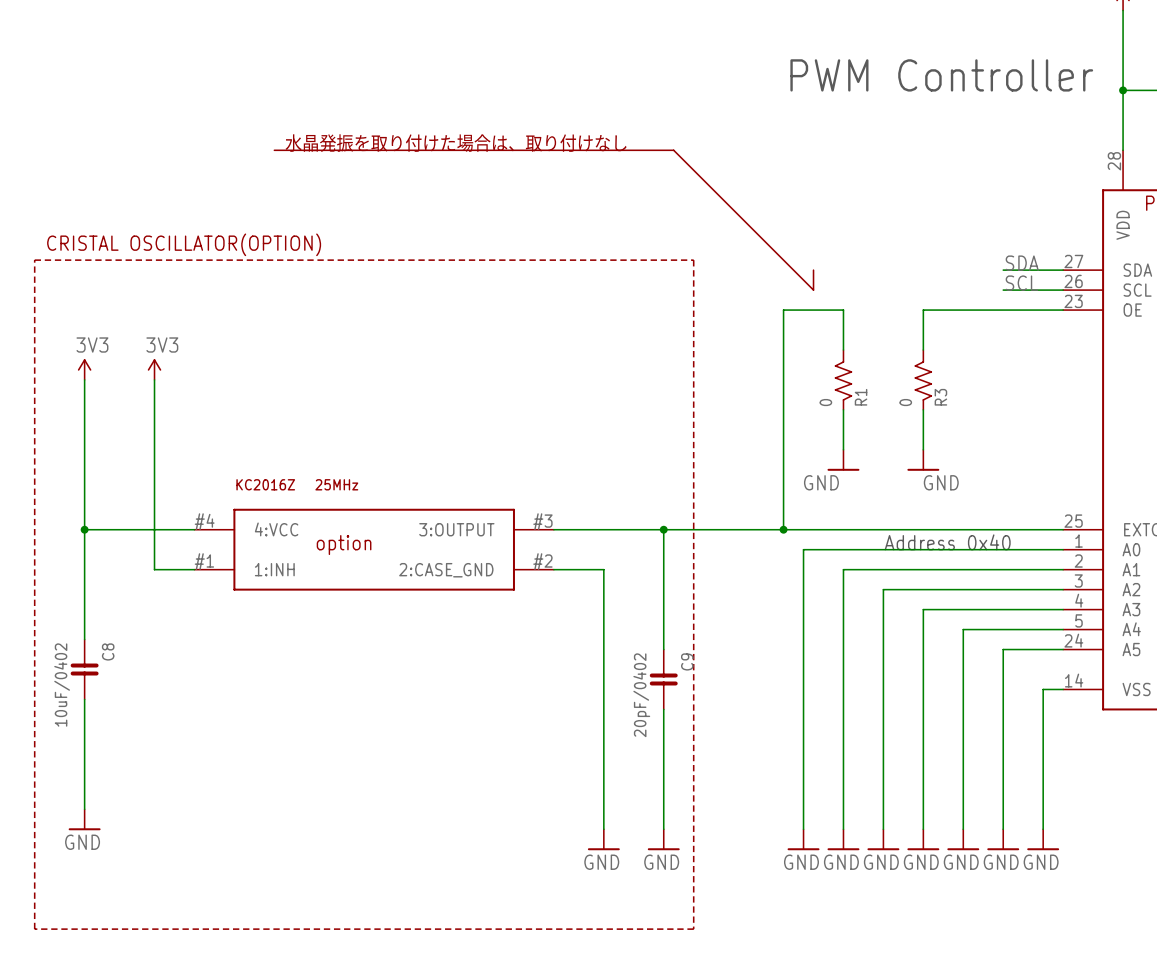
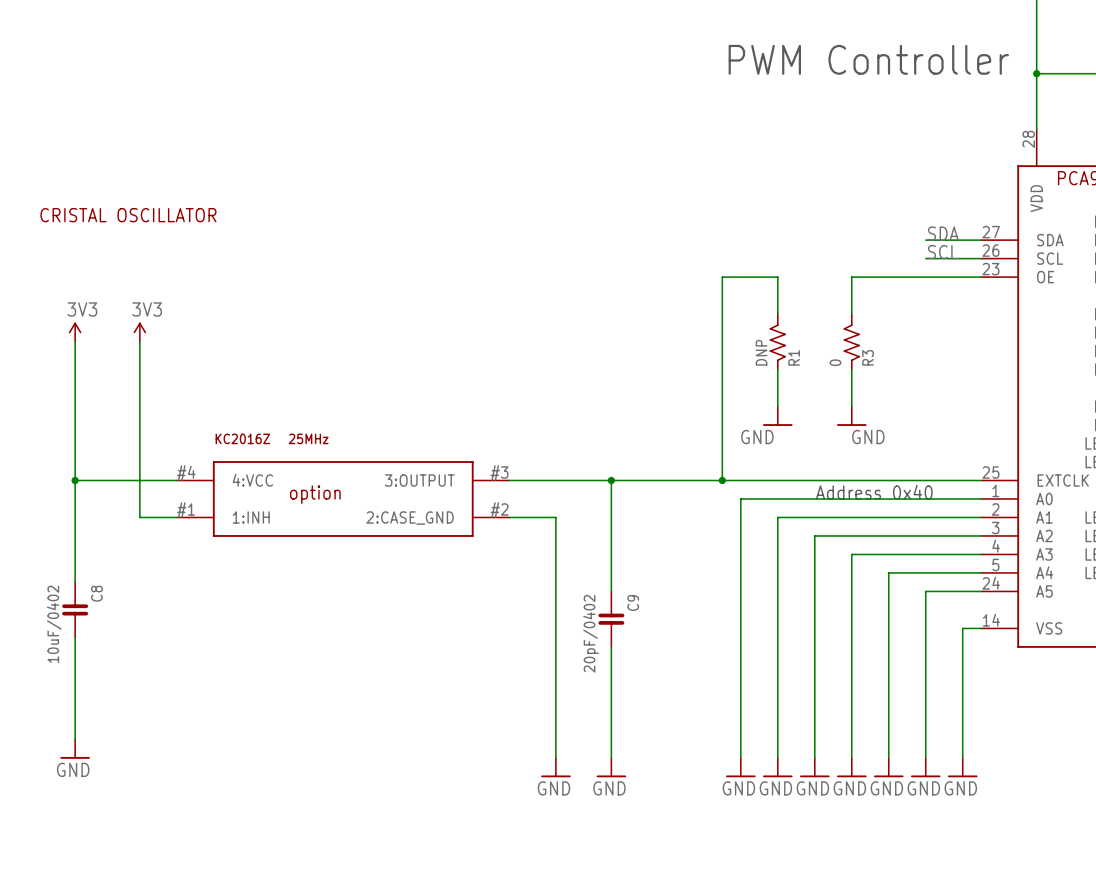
text: 水晶発振を取り付けた場合は、取り付けなし (456, 143) -> none
line: (274, 150) (673, 150) (813, 290) (813, 270) -> none
text: CRISTAL OSCILLATOR(OPTION) (184, 244) -> CRISTAL OSCILLATOR (128, 215)
line: (34, 260) (693, 260) (693, 929) (34, 929) (34, 260) -> none
R1 value: 0 (825, 402) -> DNP (761, 352)

